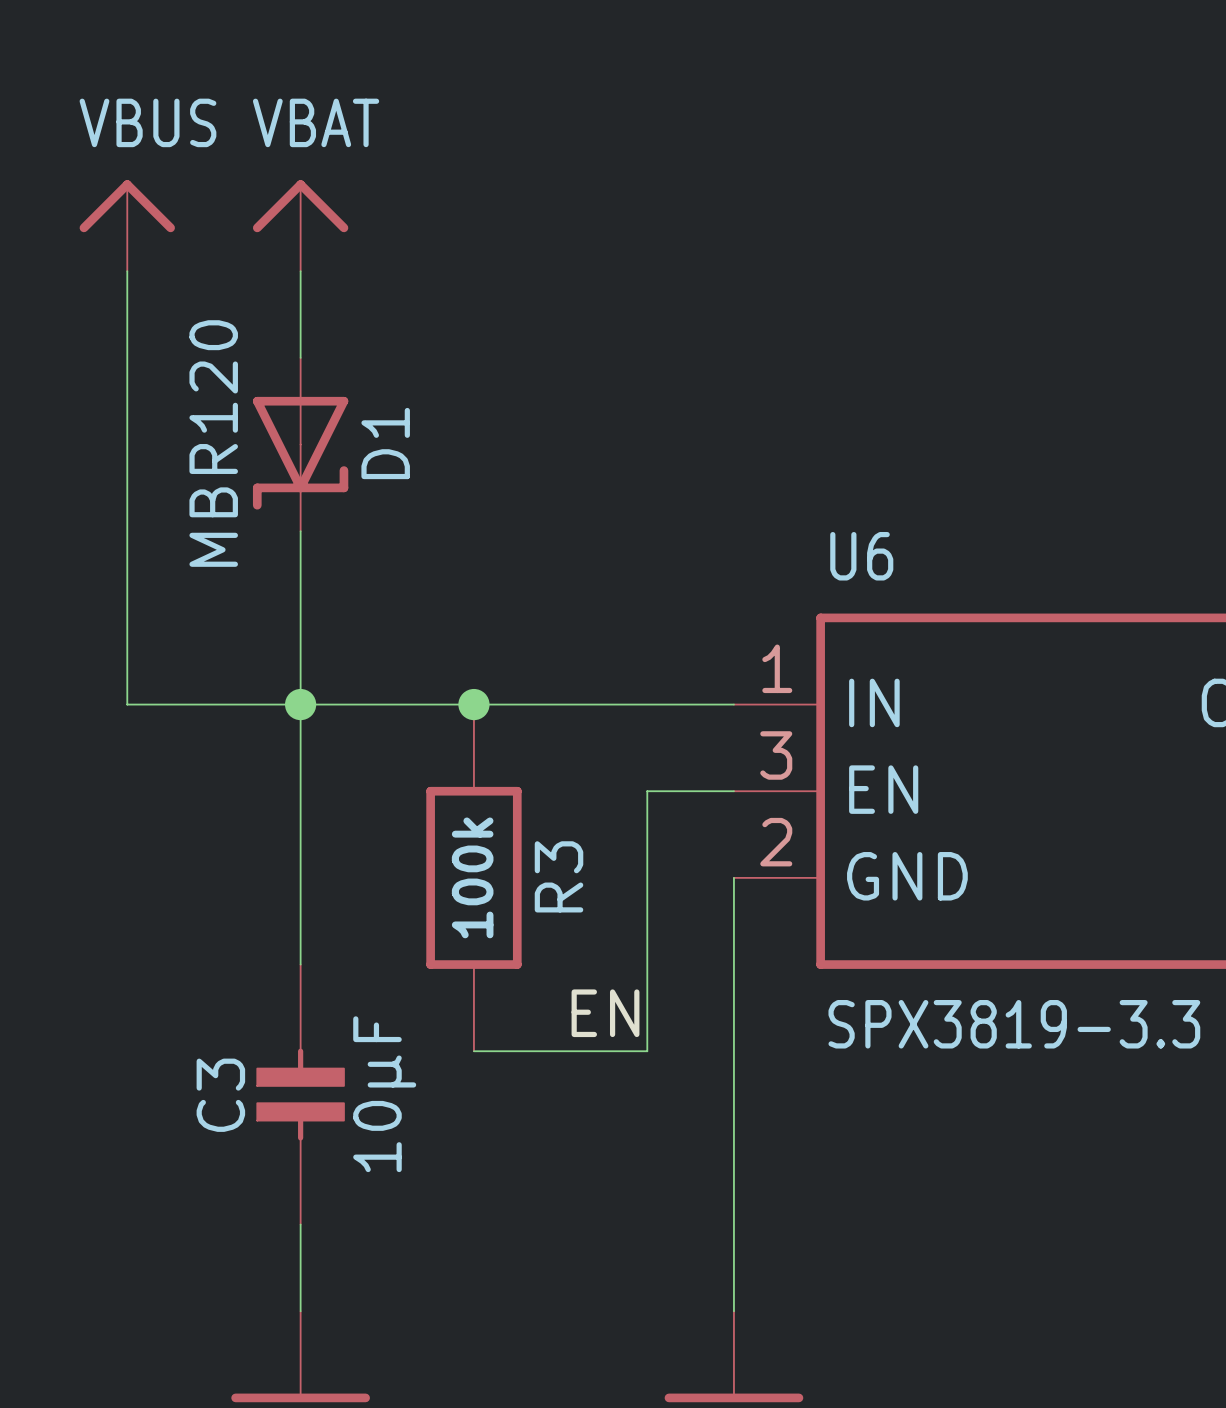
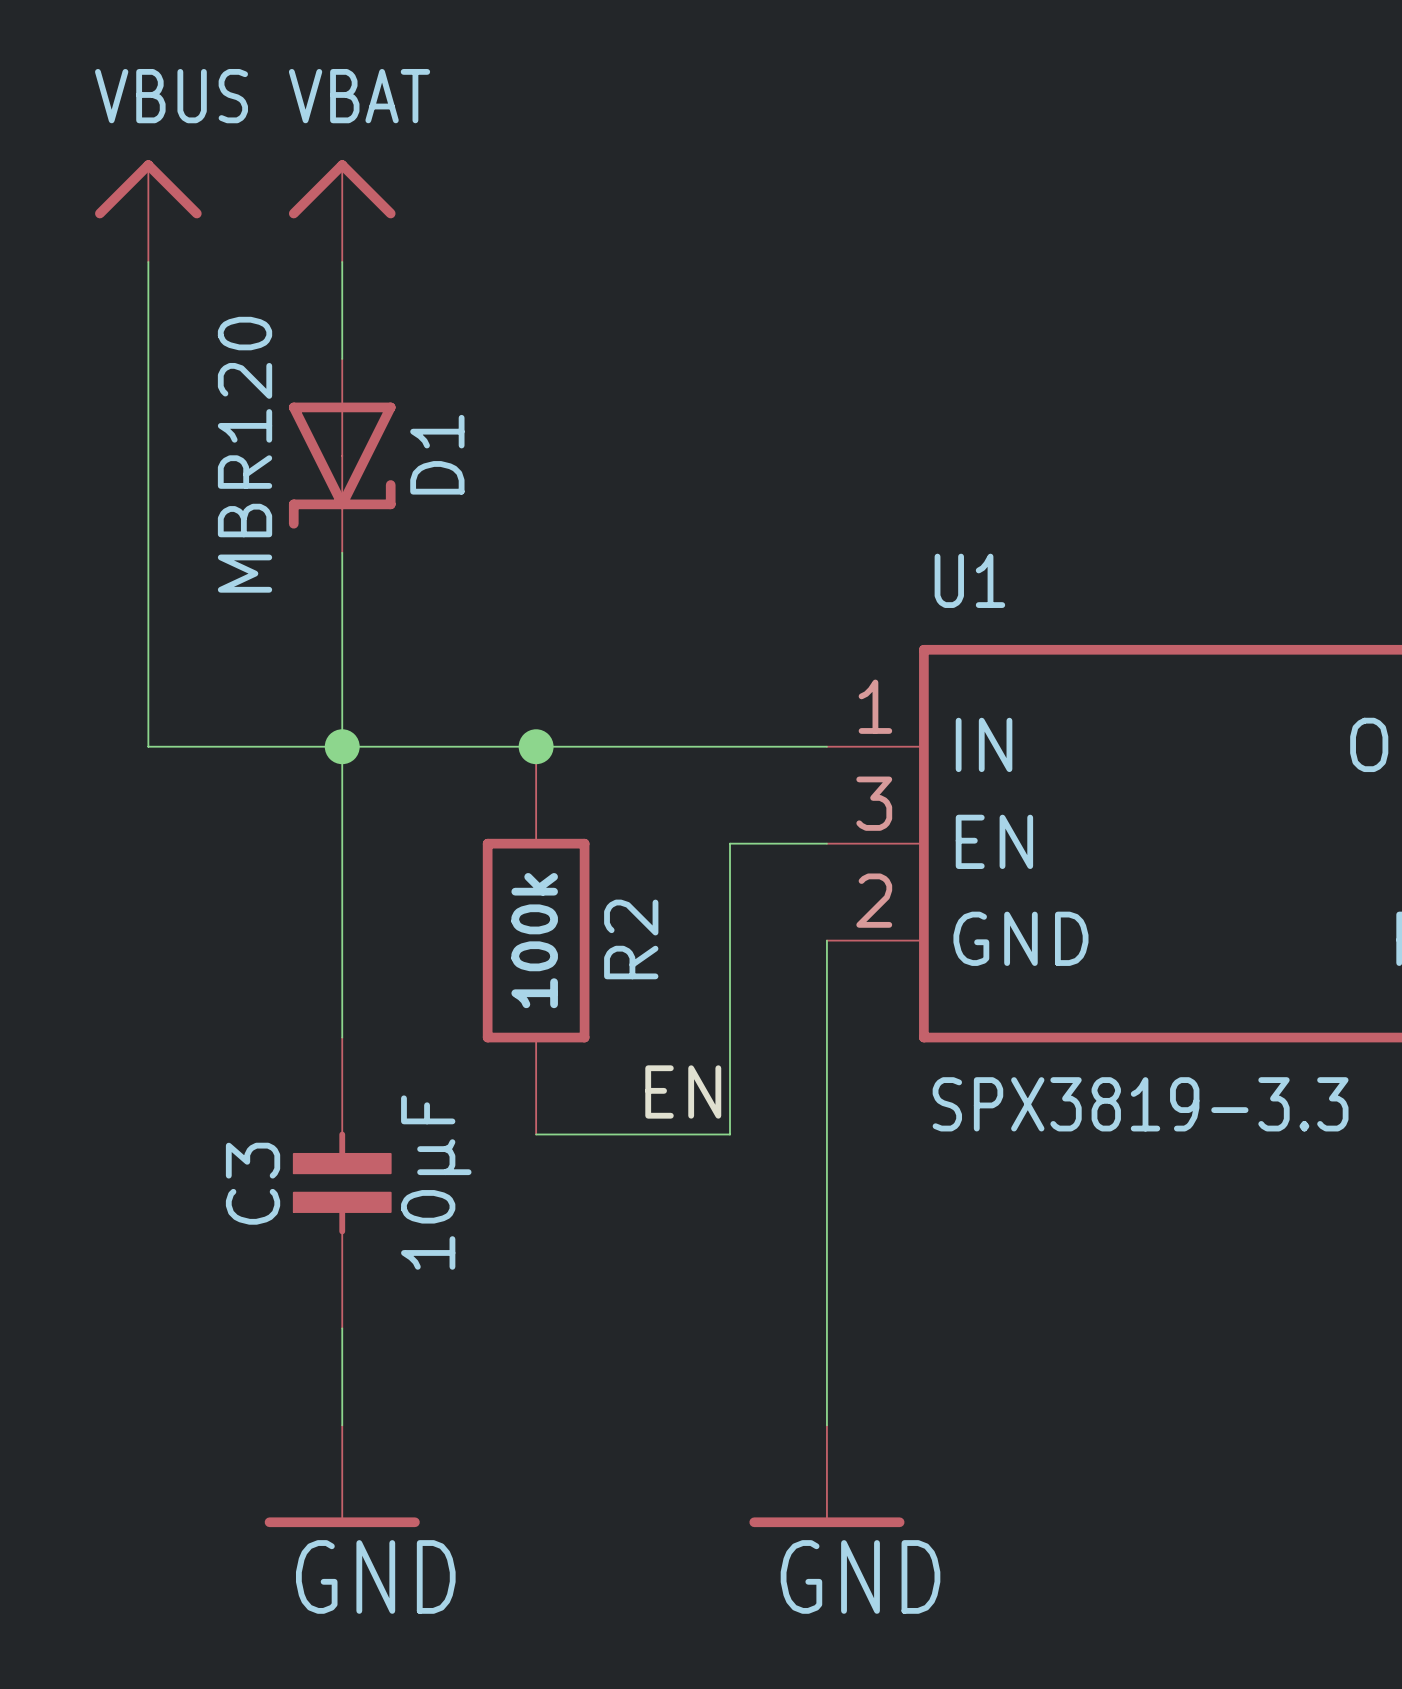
U6 name: U6 (861, 556) -> U1 (969, 580)
R3 name: R3 (559, 876) -> R2 (631, 939)

